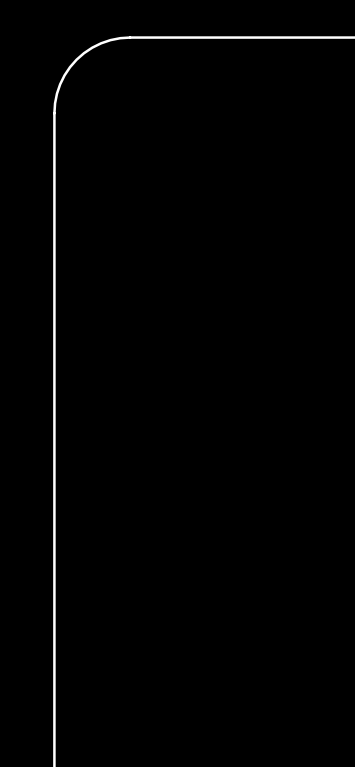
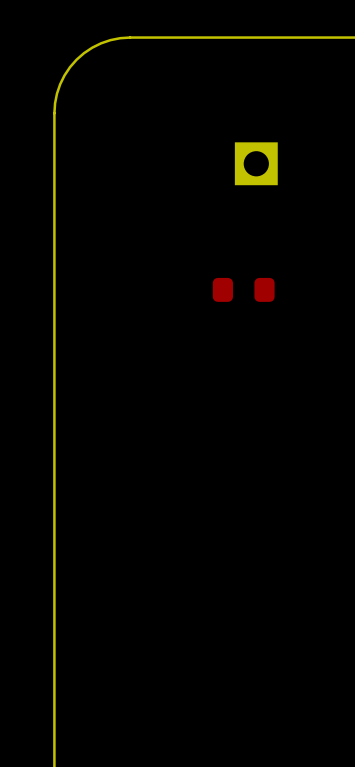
part: none -> (256, 163)
part: none -> (243, 289)

